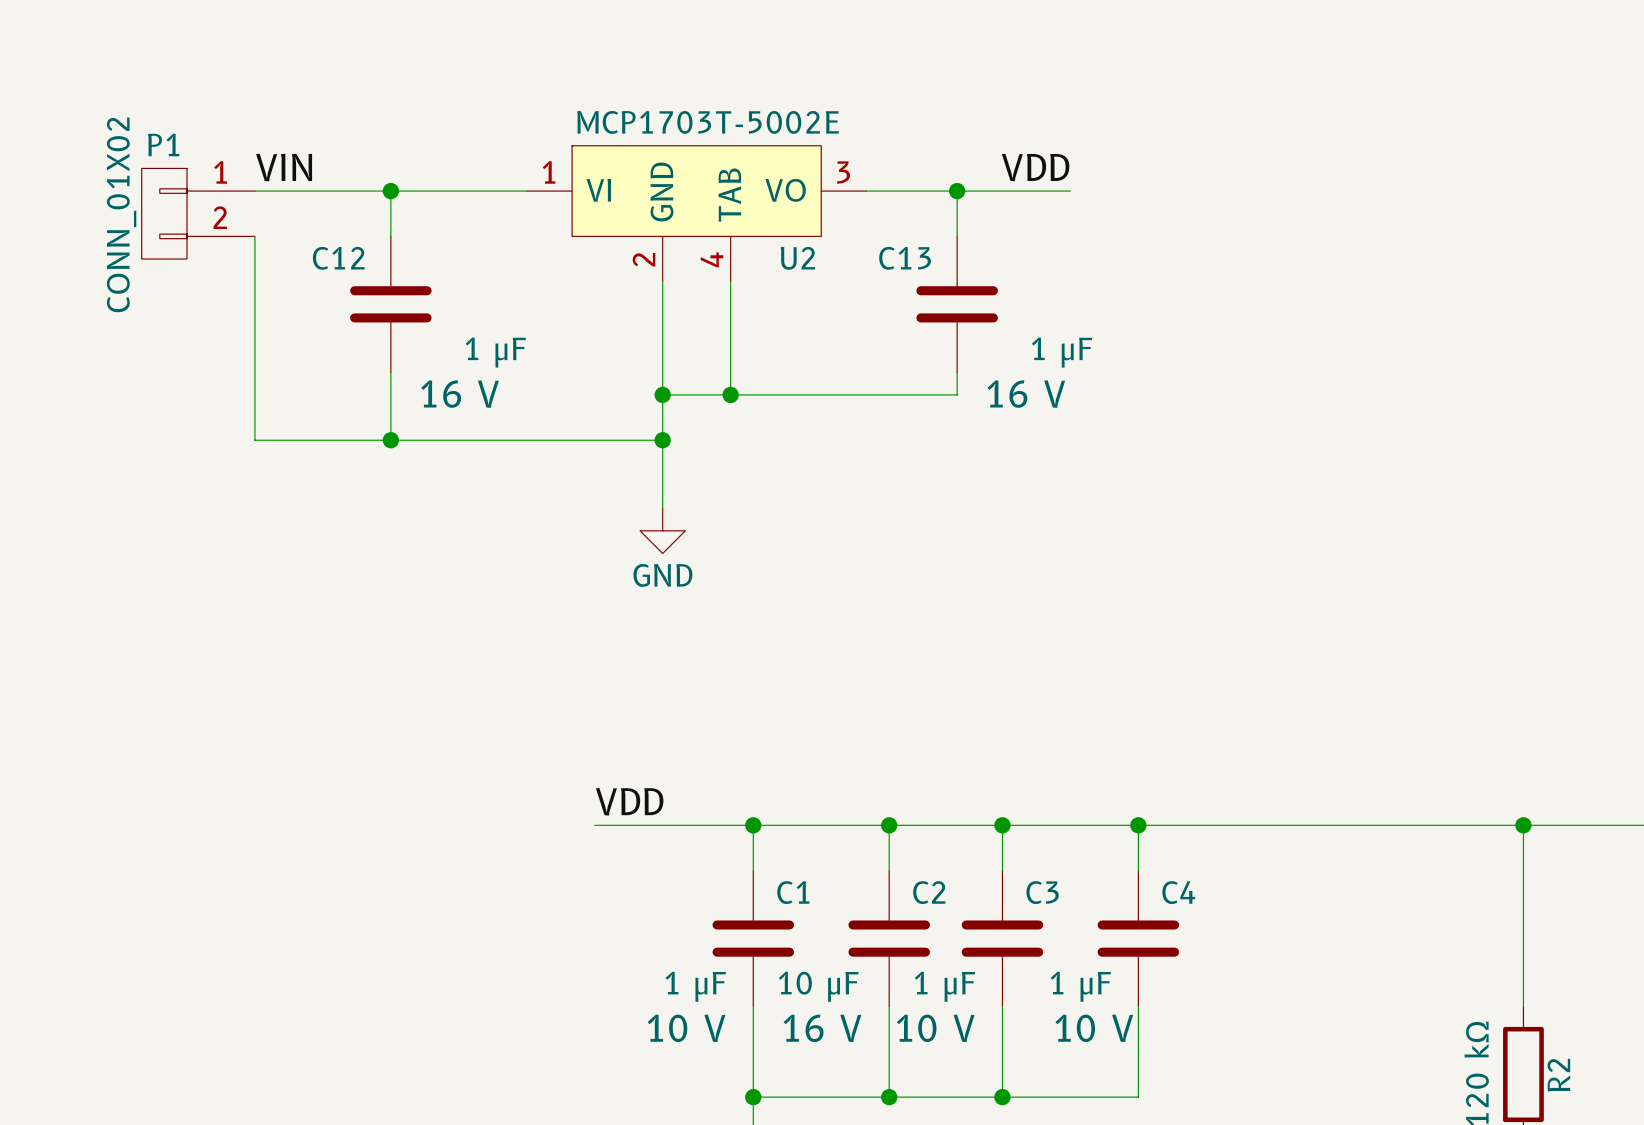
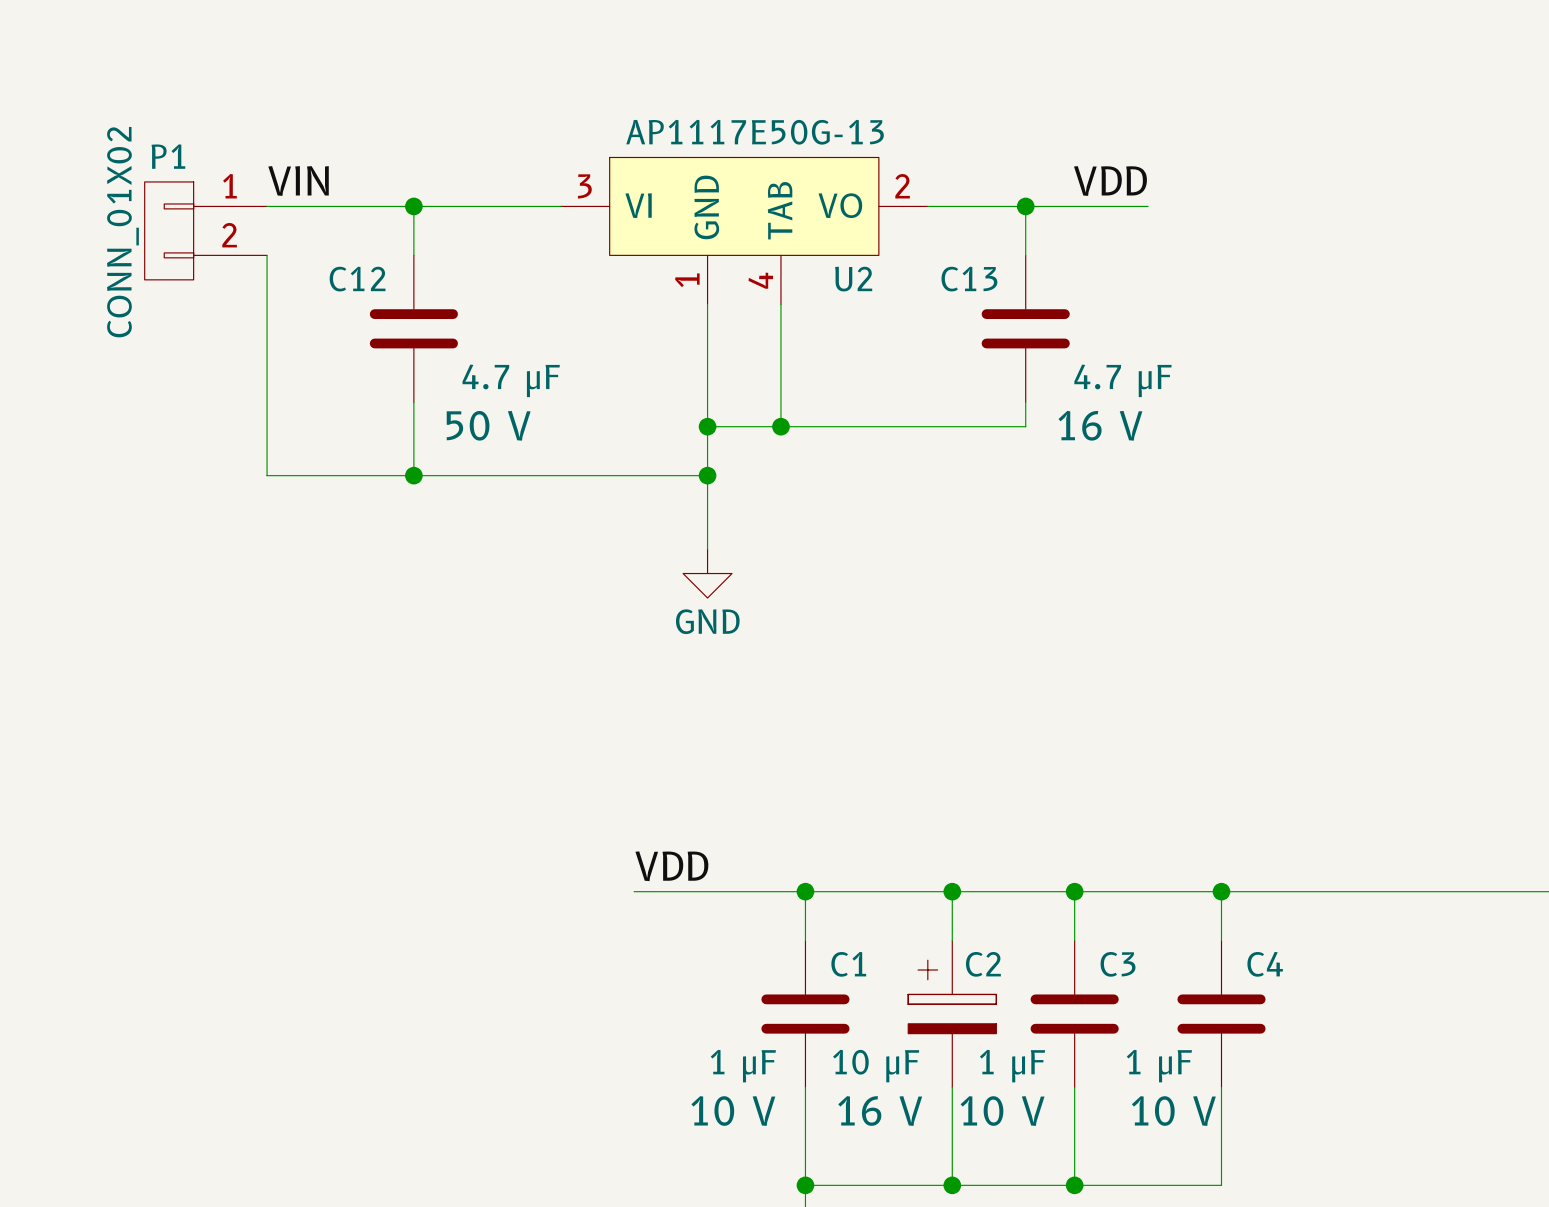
U2 value: MCP1703T-5002E (708, 122) -> AP1117E50G-13 (755, 132)
U2 pin number: 1 (549, 172) -> 3 (584, 186)
U2 pin number: 3 (843, 172) -> 2 (902, 186)
U2 pin number: 2 (644, 259) -> 1 (687, 280)
C12 value: 1 μF (495, 352) -> 4.7 μF (511, 380)
C13 value: 1 μF (1062, 352) -> 4.7 μF (1123, 380)
C12 text: 16 V (460, 394) -> 50 V (488, 425)
C2 symbol: [848, 870, 930, 1007] -> [908, 940, 997, 1088]

